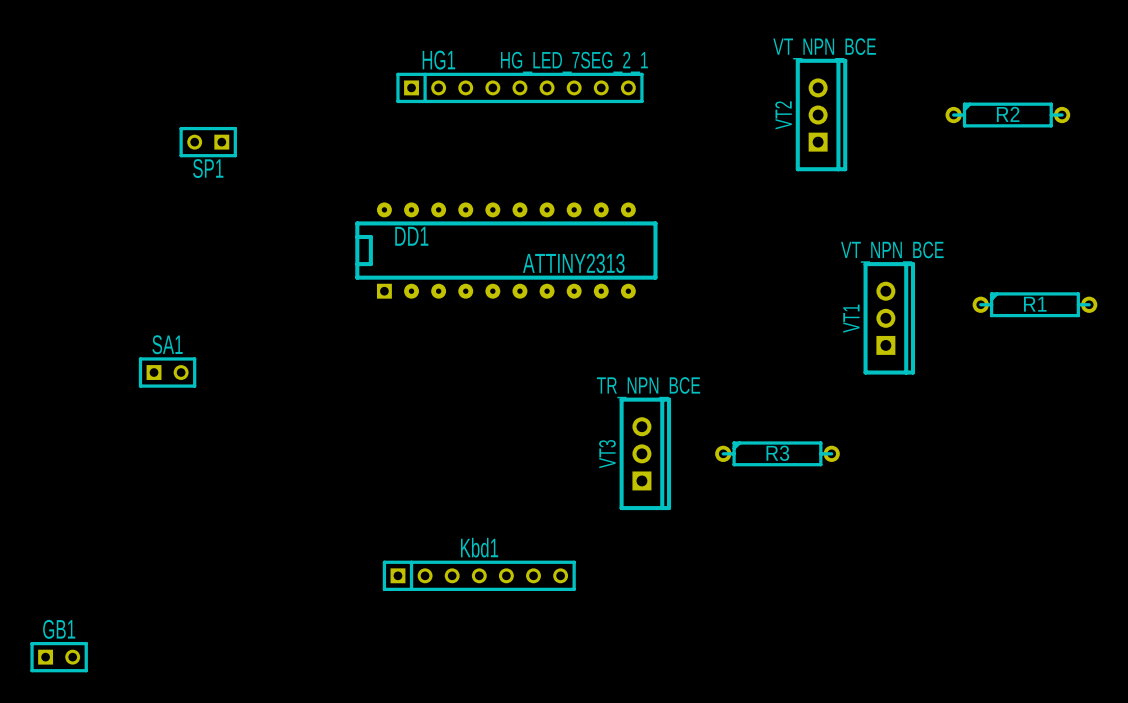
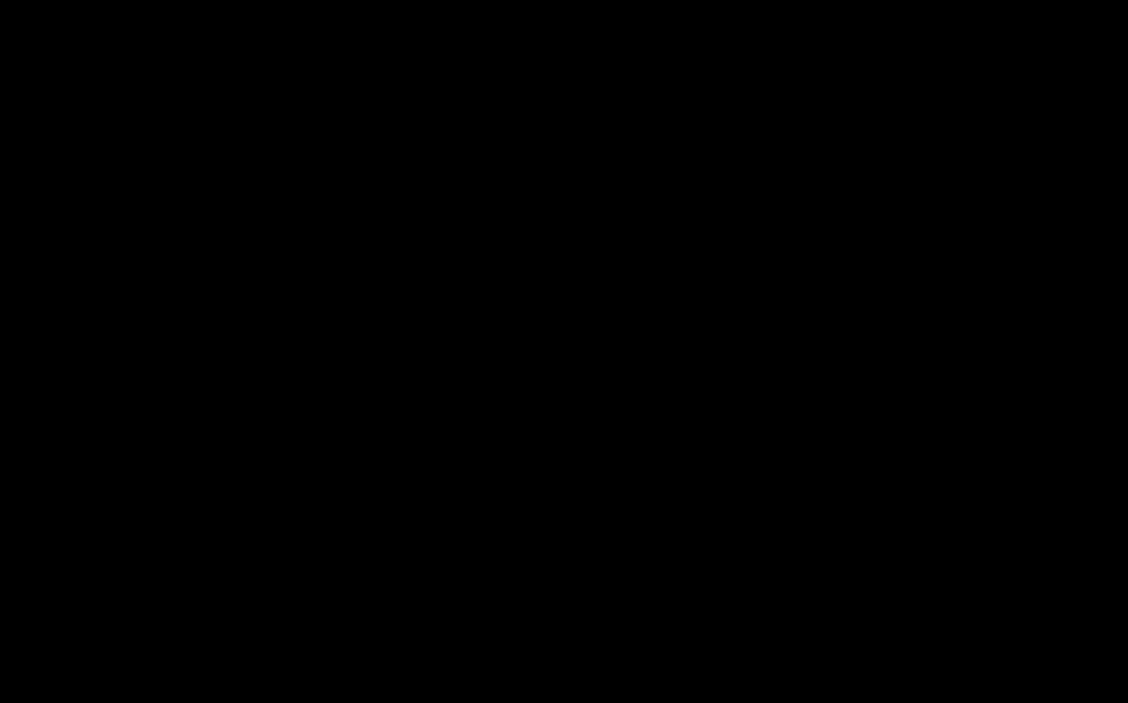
HG1: HG_LED_7SEG_2_1 (519, 87) -> none
VT2: VT_NPN_BCE (821, 115) -> none
R2: (1007, 115) -> none
SP1: (208, 142) -> none
DD1: ATTINY2313 (506, 250) -> none
R1: (1034, 304) -> none
VT1: VT_NPN_BCE (889, 318) -> none
SA1: (167, 372) -> none
VT3: TR_NPN_BCE (645, 453) -> none
R3: (777, 453) -> none
Kbd1: (479, 575) -> none
GB1: (59, 657) -> none

